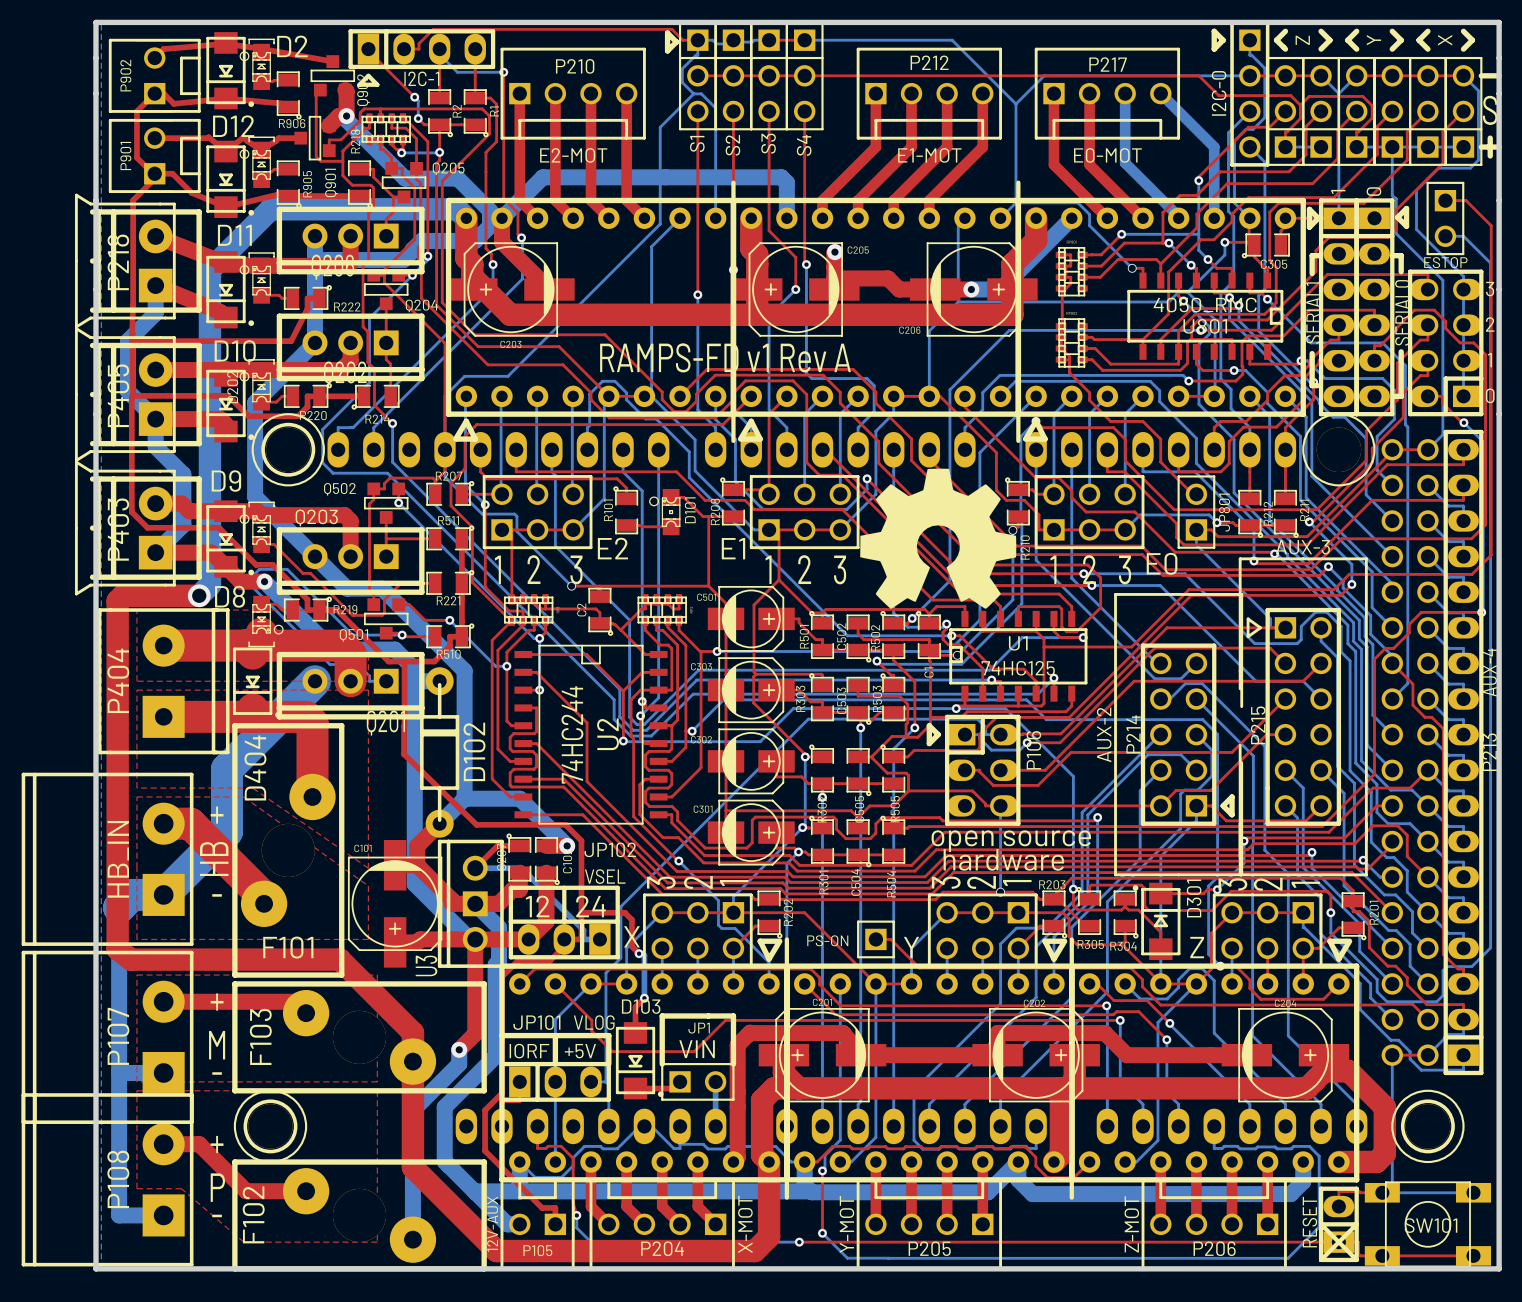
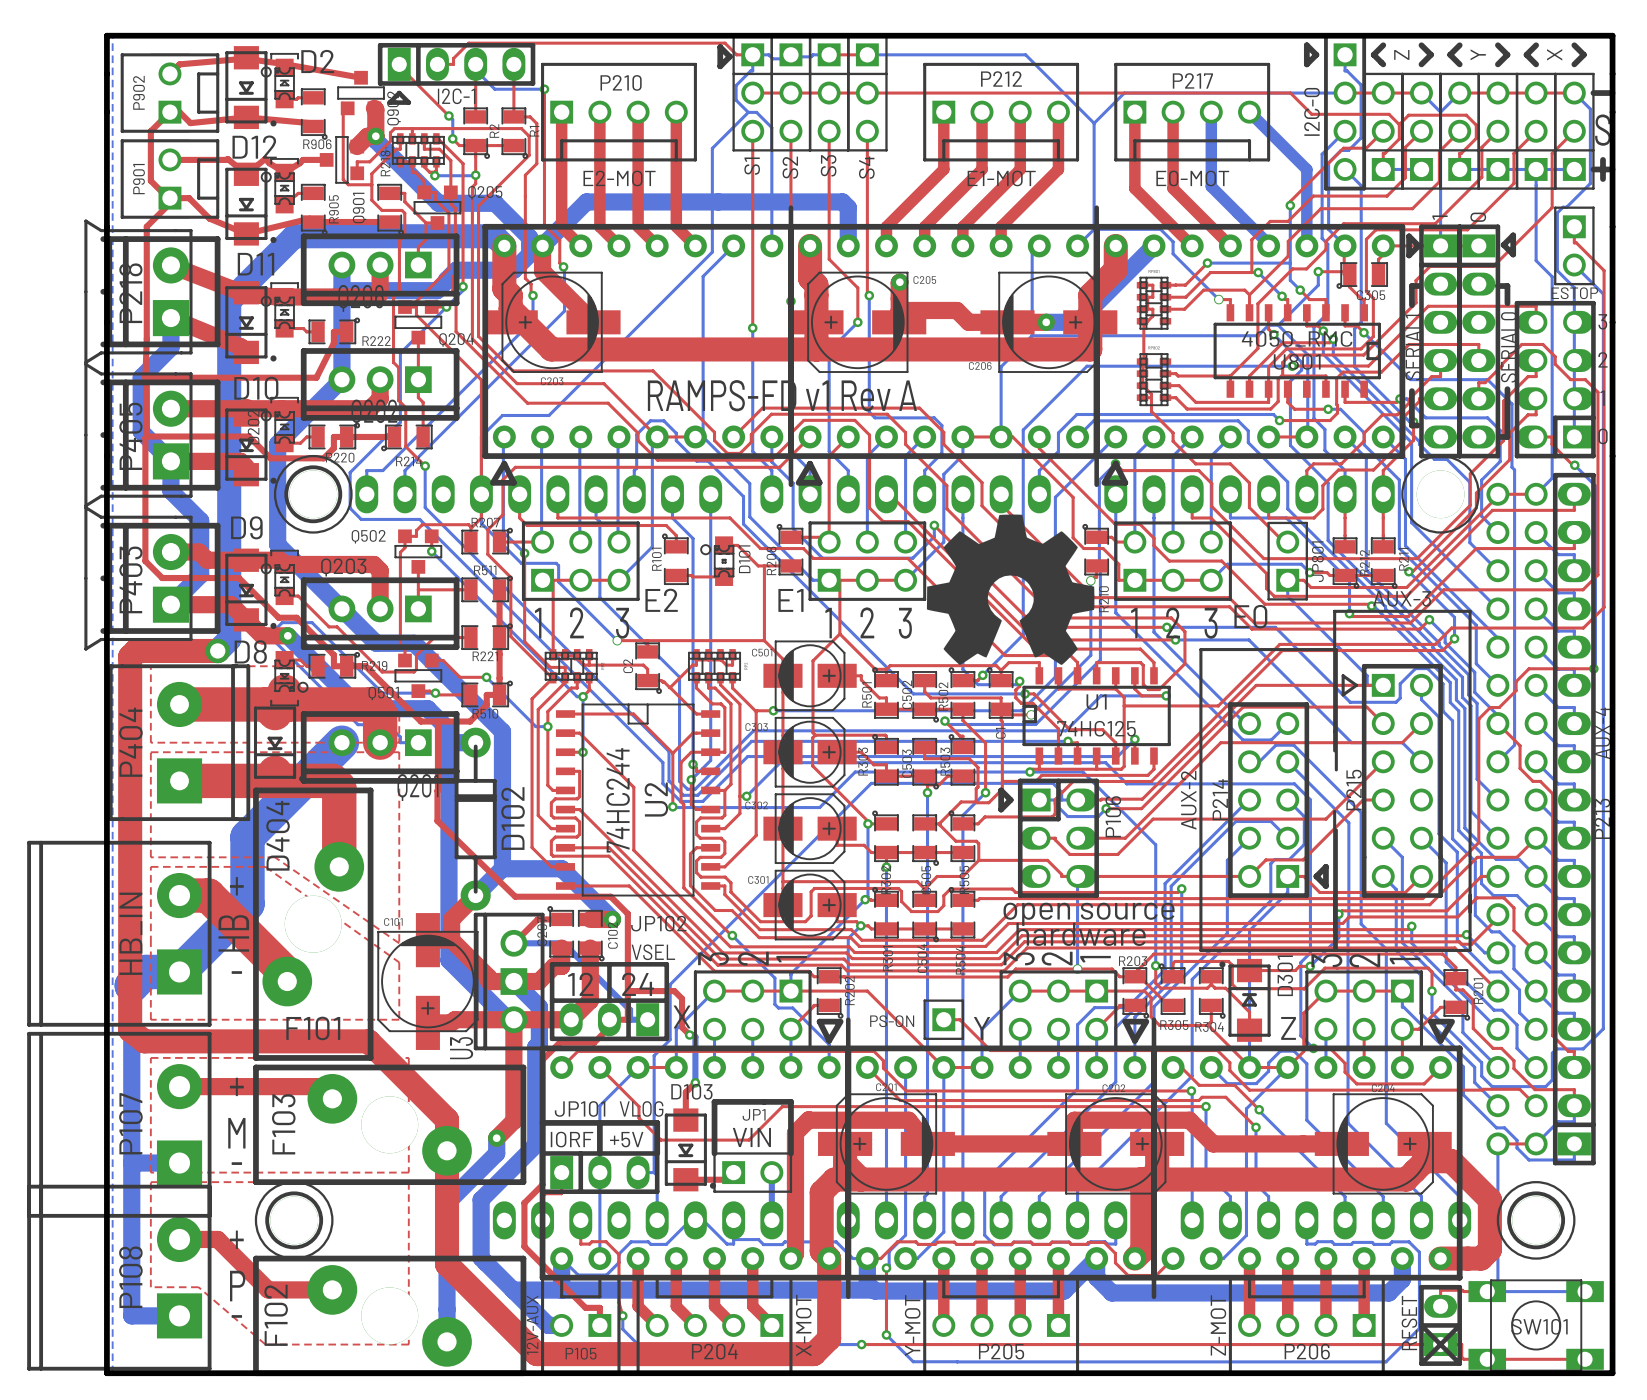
top track: (1442, 132) (1442, 163) (1396, 210) (1396, 229) (1388, 237) -> (1552, 153) (1552, 207) (1493, 266)
bottom track: (1392, 147) (1392, 195) (1396, 198) (1396, 233) (1442, 280) -> (1536, 169) (1536, 260) (1552, 276) (1552, 312)
bottom track: (1470, 168) (1438, 168) (1416, 190) (1416, 229) (1463, 276) -> (1581, 192) (1566, 207) (1563, 207) (1557, 212) (1557, 270) (1574, 287) (1574, 308)
top track: (1445, 200) (1466, 200) (1491, 225) (1491, 241) -> (1574, 226) (1574, 242) (1604, 270)
part position: (1445, 218) -> (1574, 245)
bottom track: (1445, 236) (1463, 236) (1490, 263) -> (1574, 265) (1603, 294)

